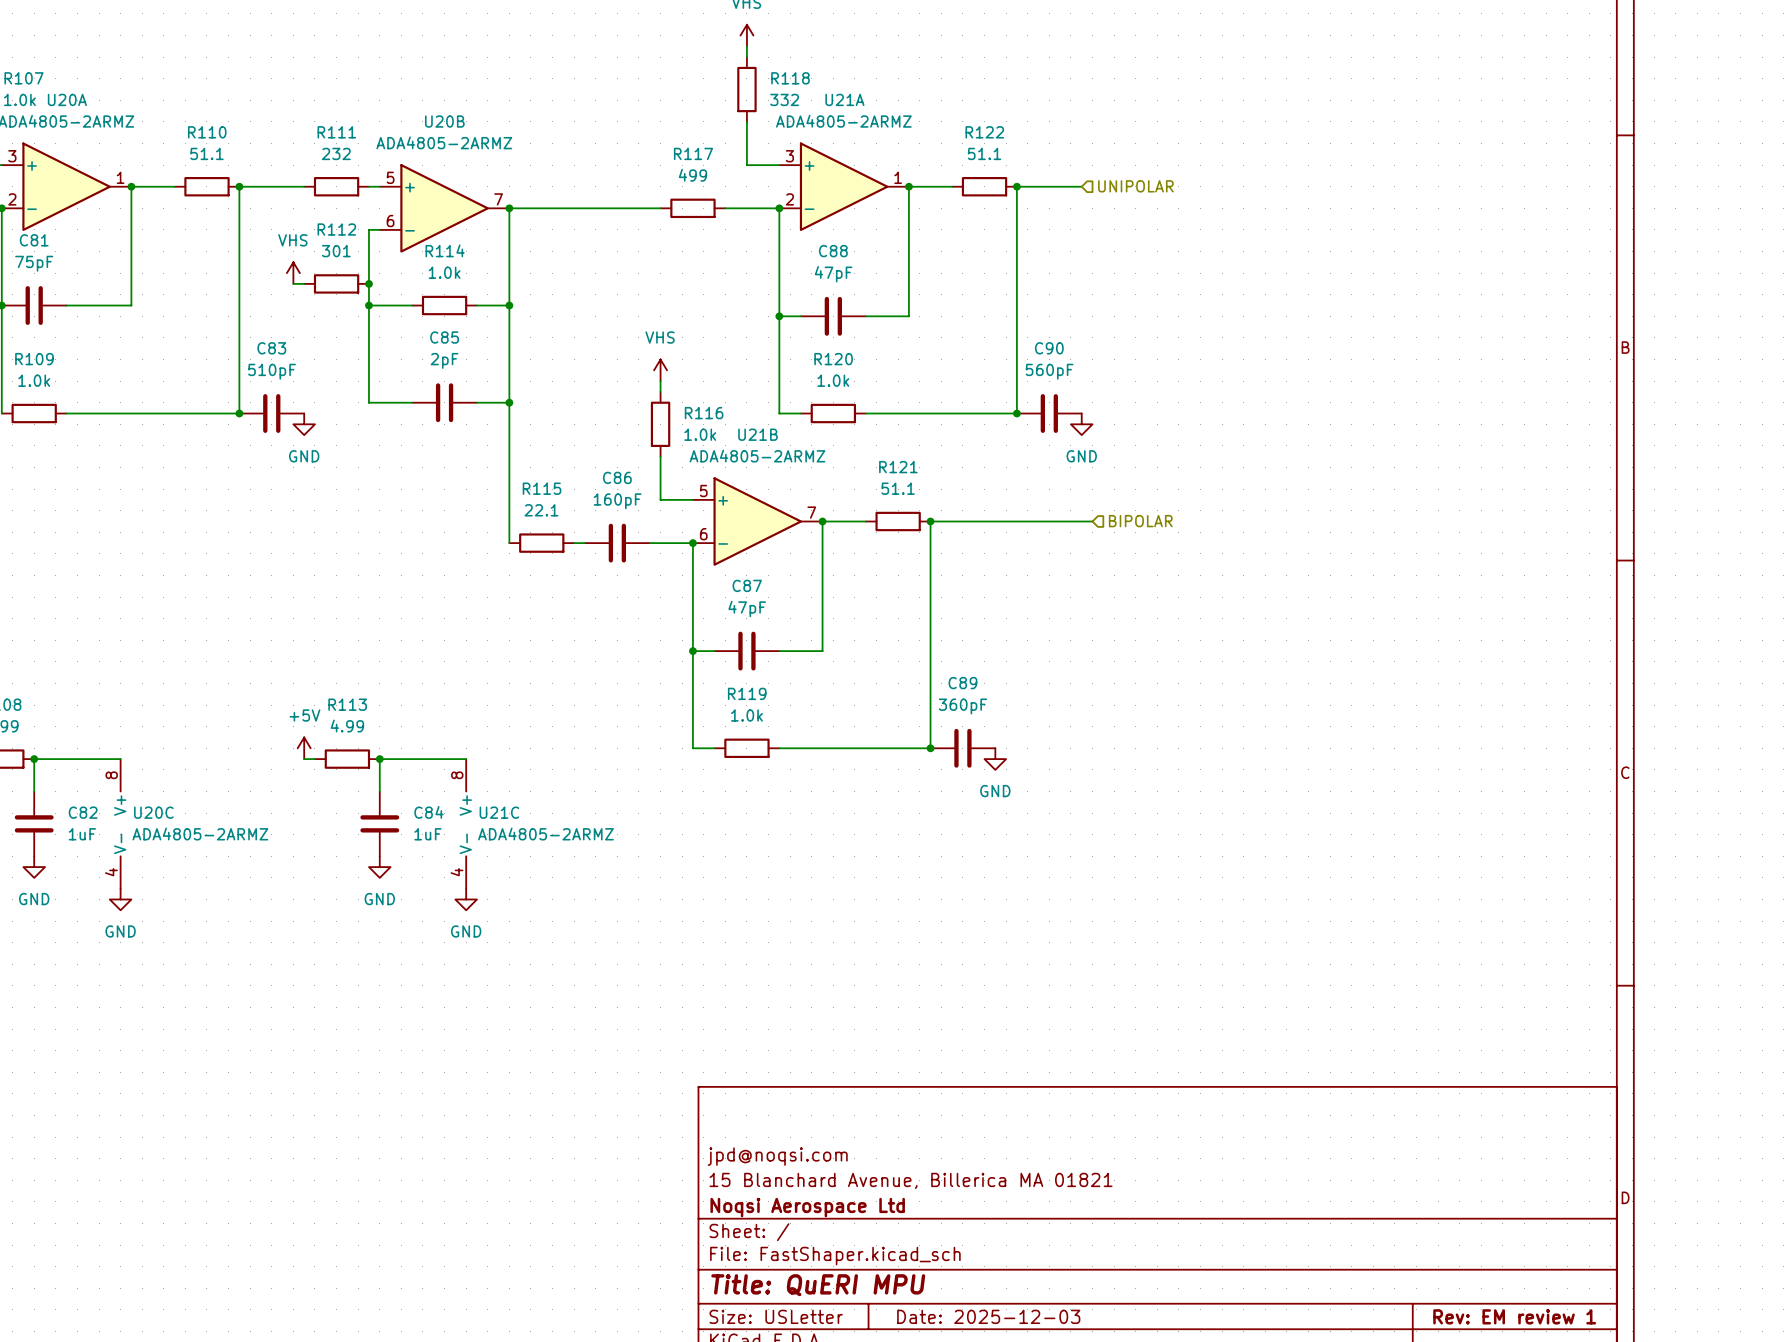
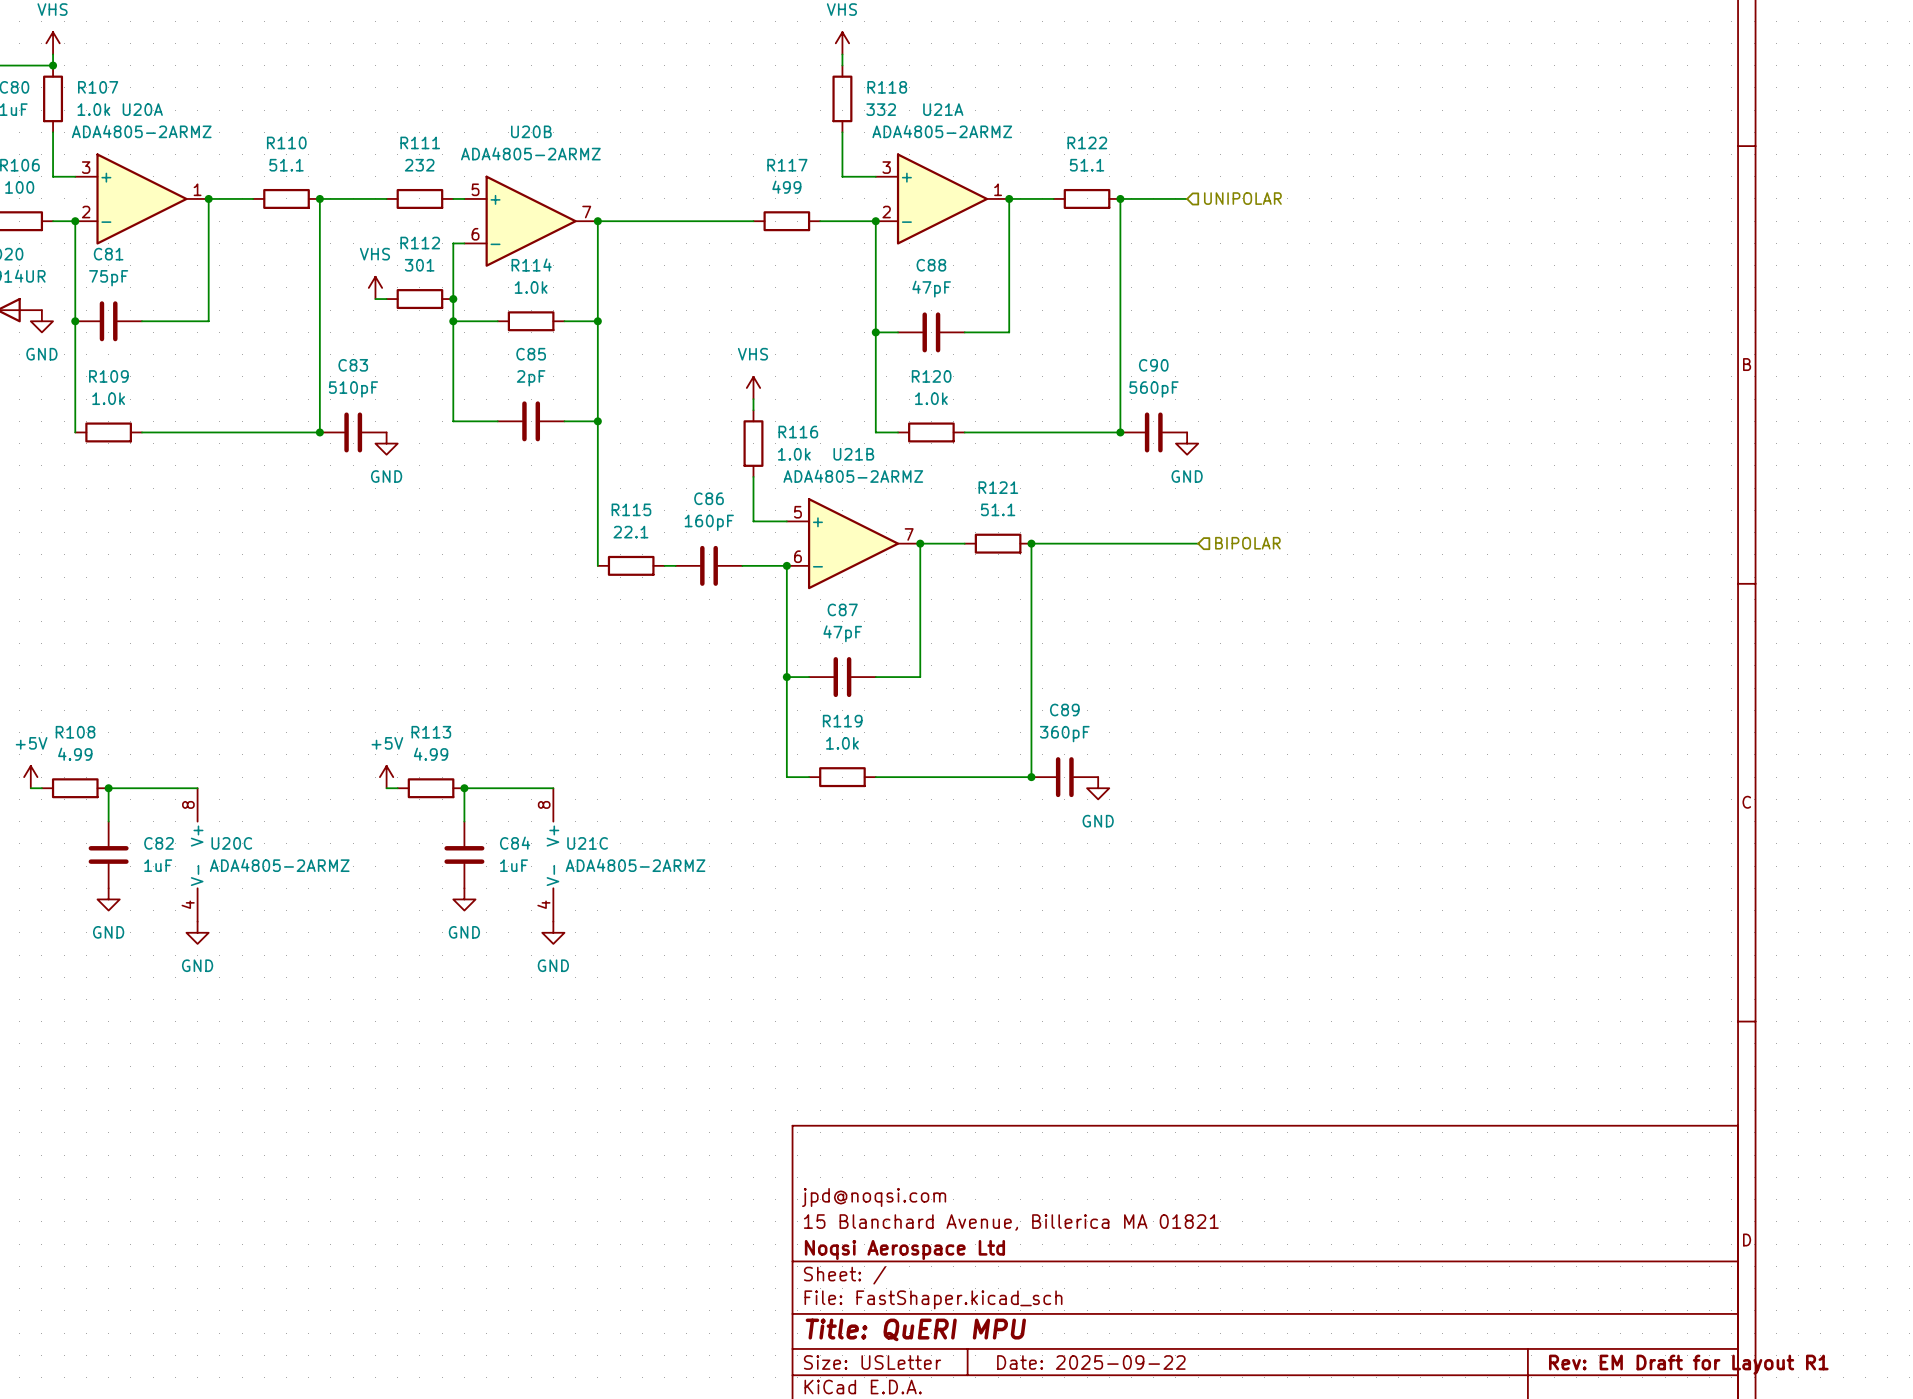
title block: Date: 2025-12-03 (988, 1316) -> Date: 2025-09-22 (1091, 1362)
title block: Rev: EM review 1 (1514, 1316) -> Rev: EM Draft for Layout R1 (1688, 1364)

